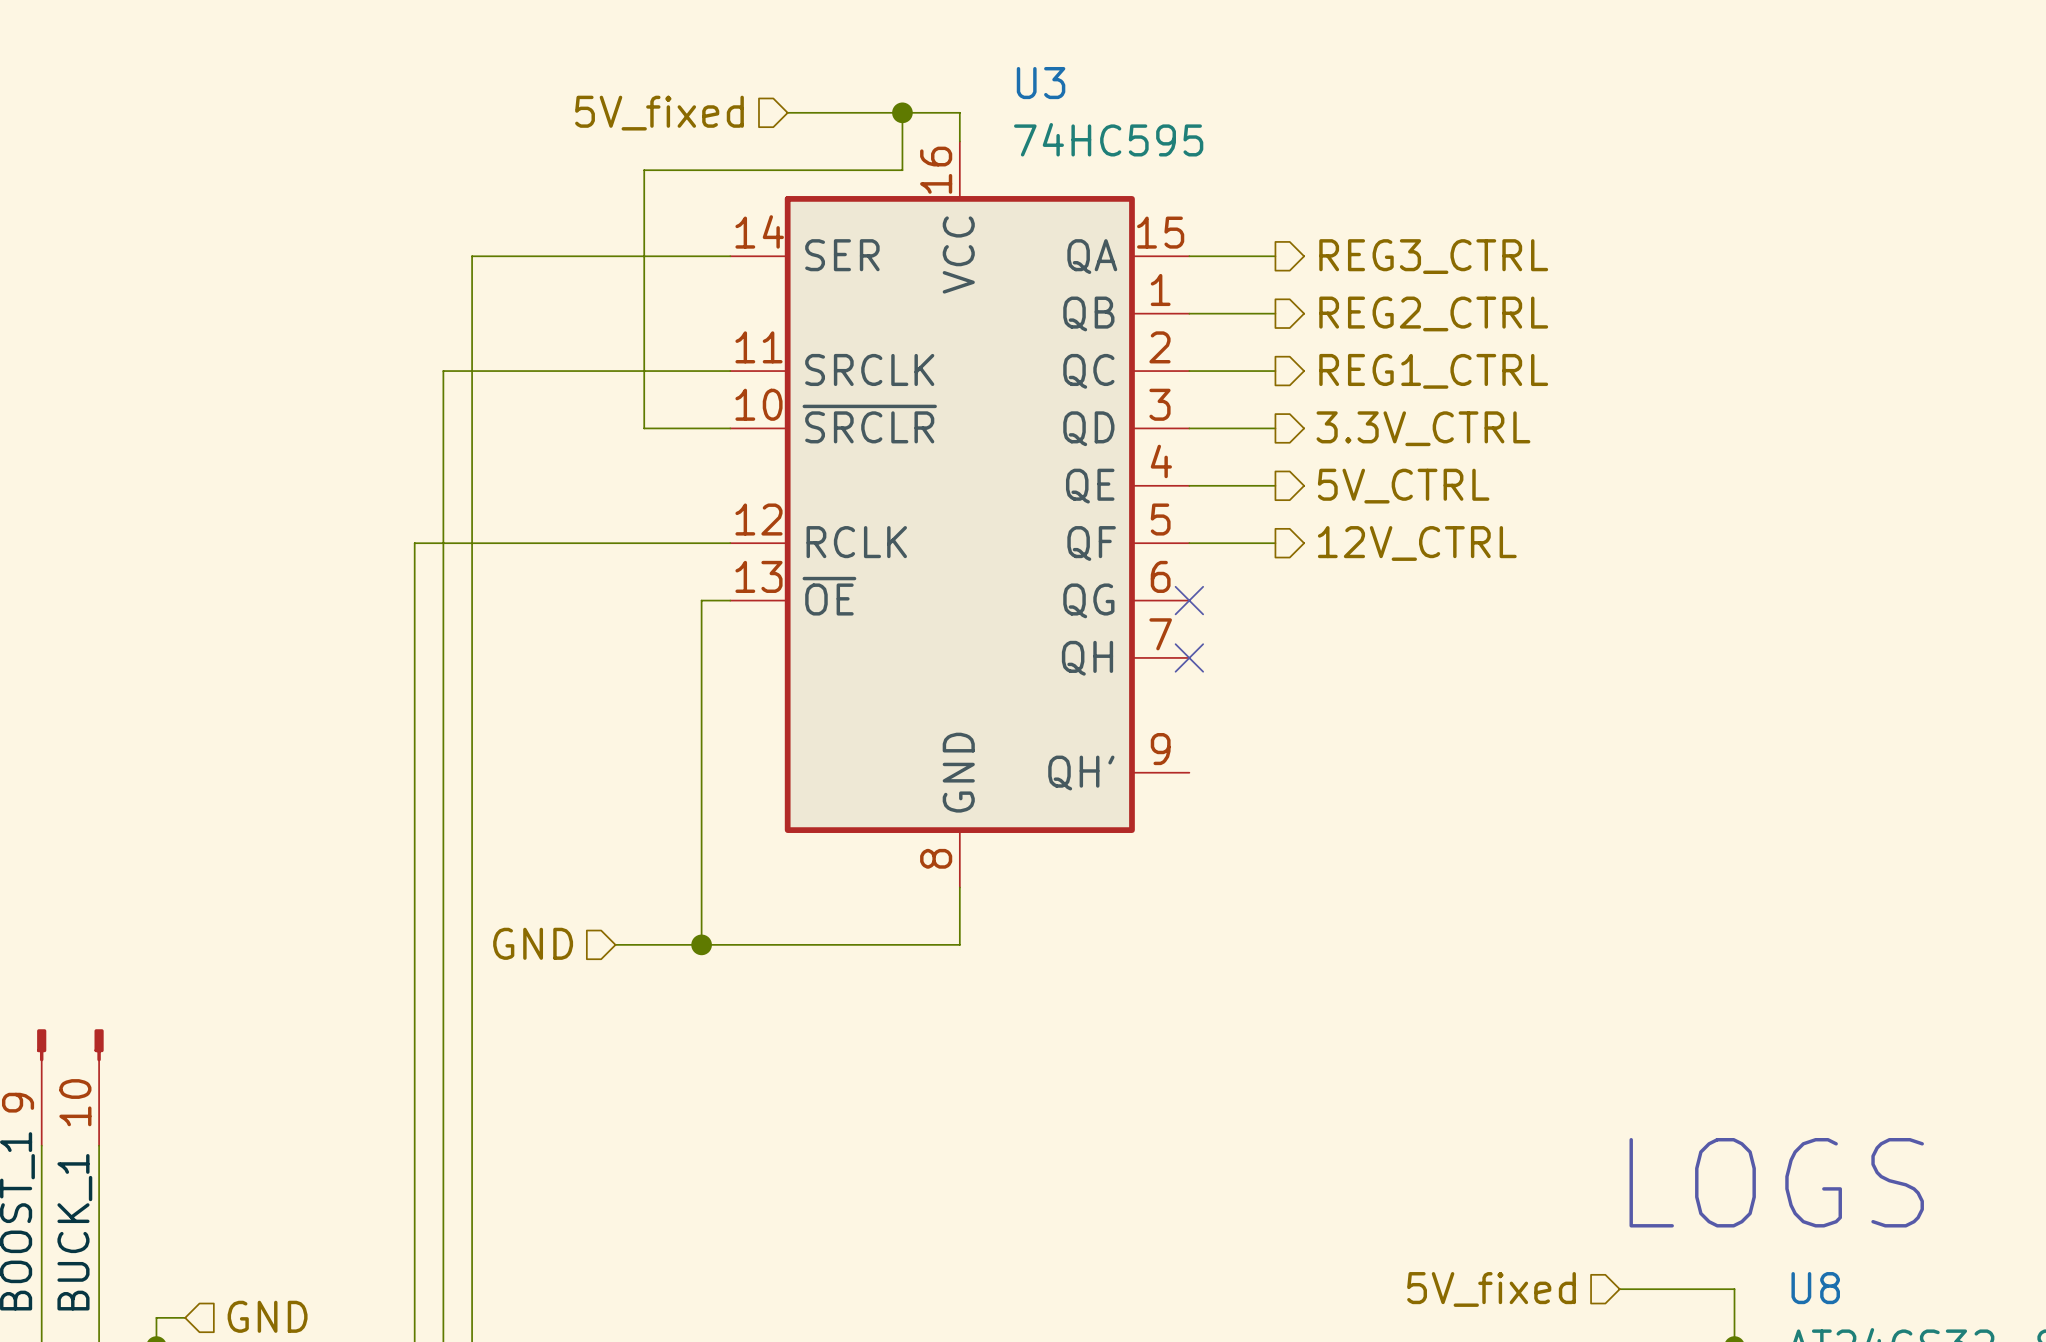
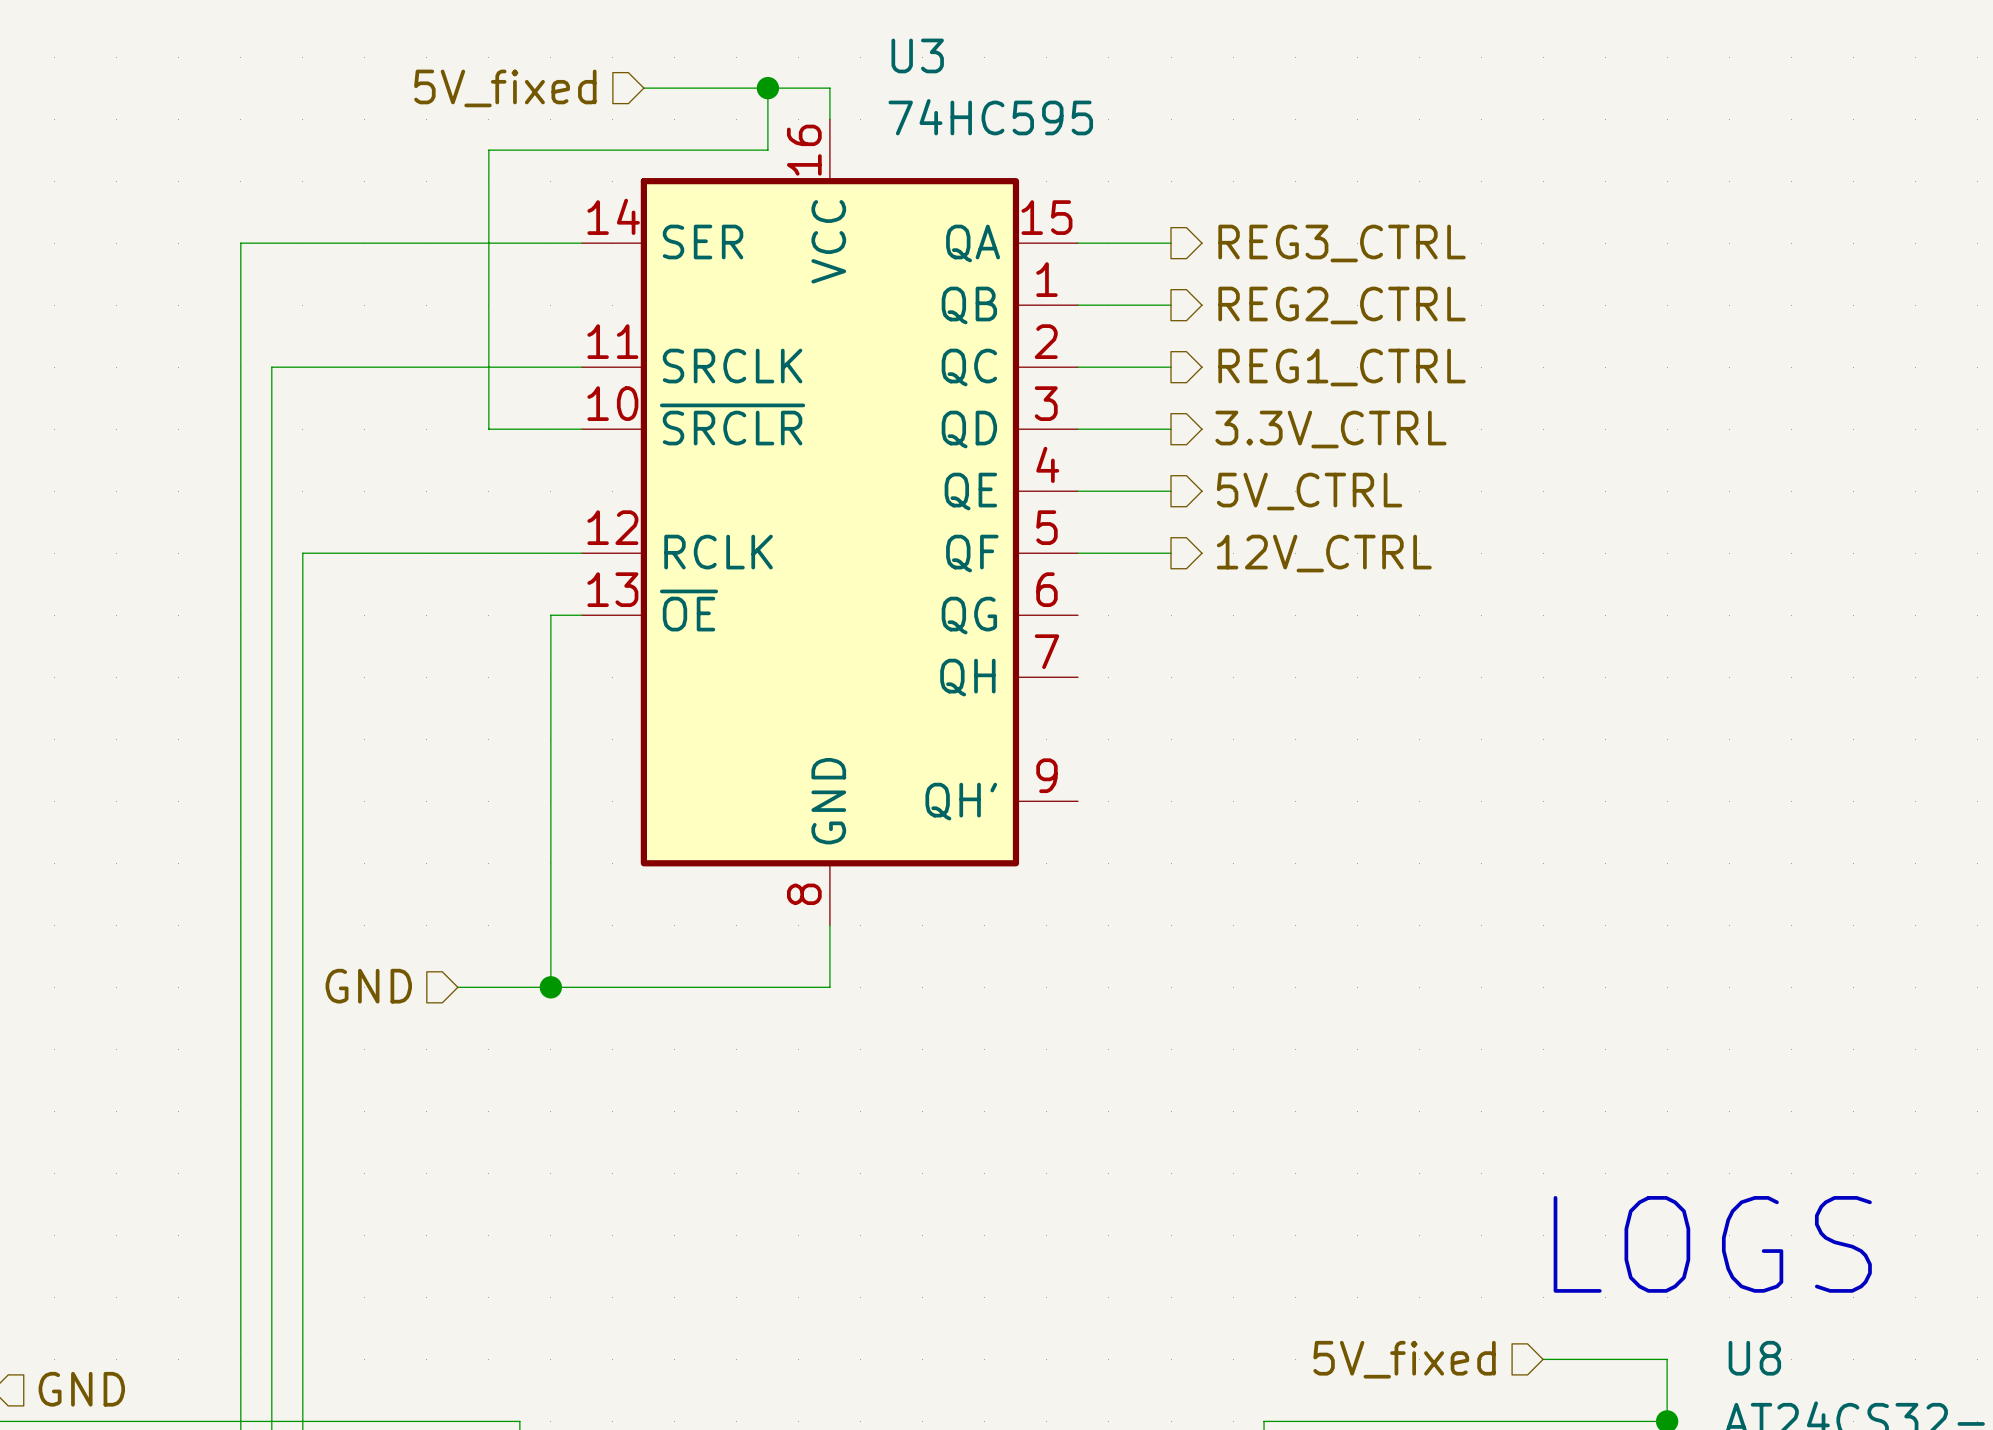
wire: (472, 256) (472, 543) (414, 543) -> (302, 243) (240, 243) (240, 553)
no-connect mark: (1189, 600) -> none
no-connect mark: (1189, 657) -> none

